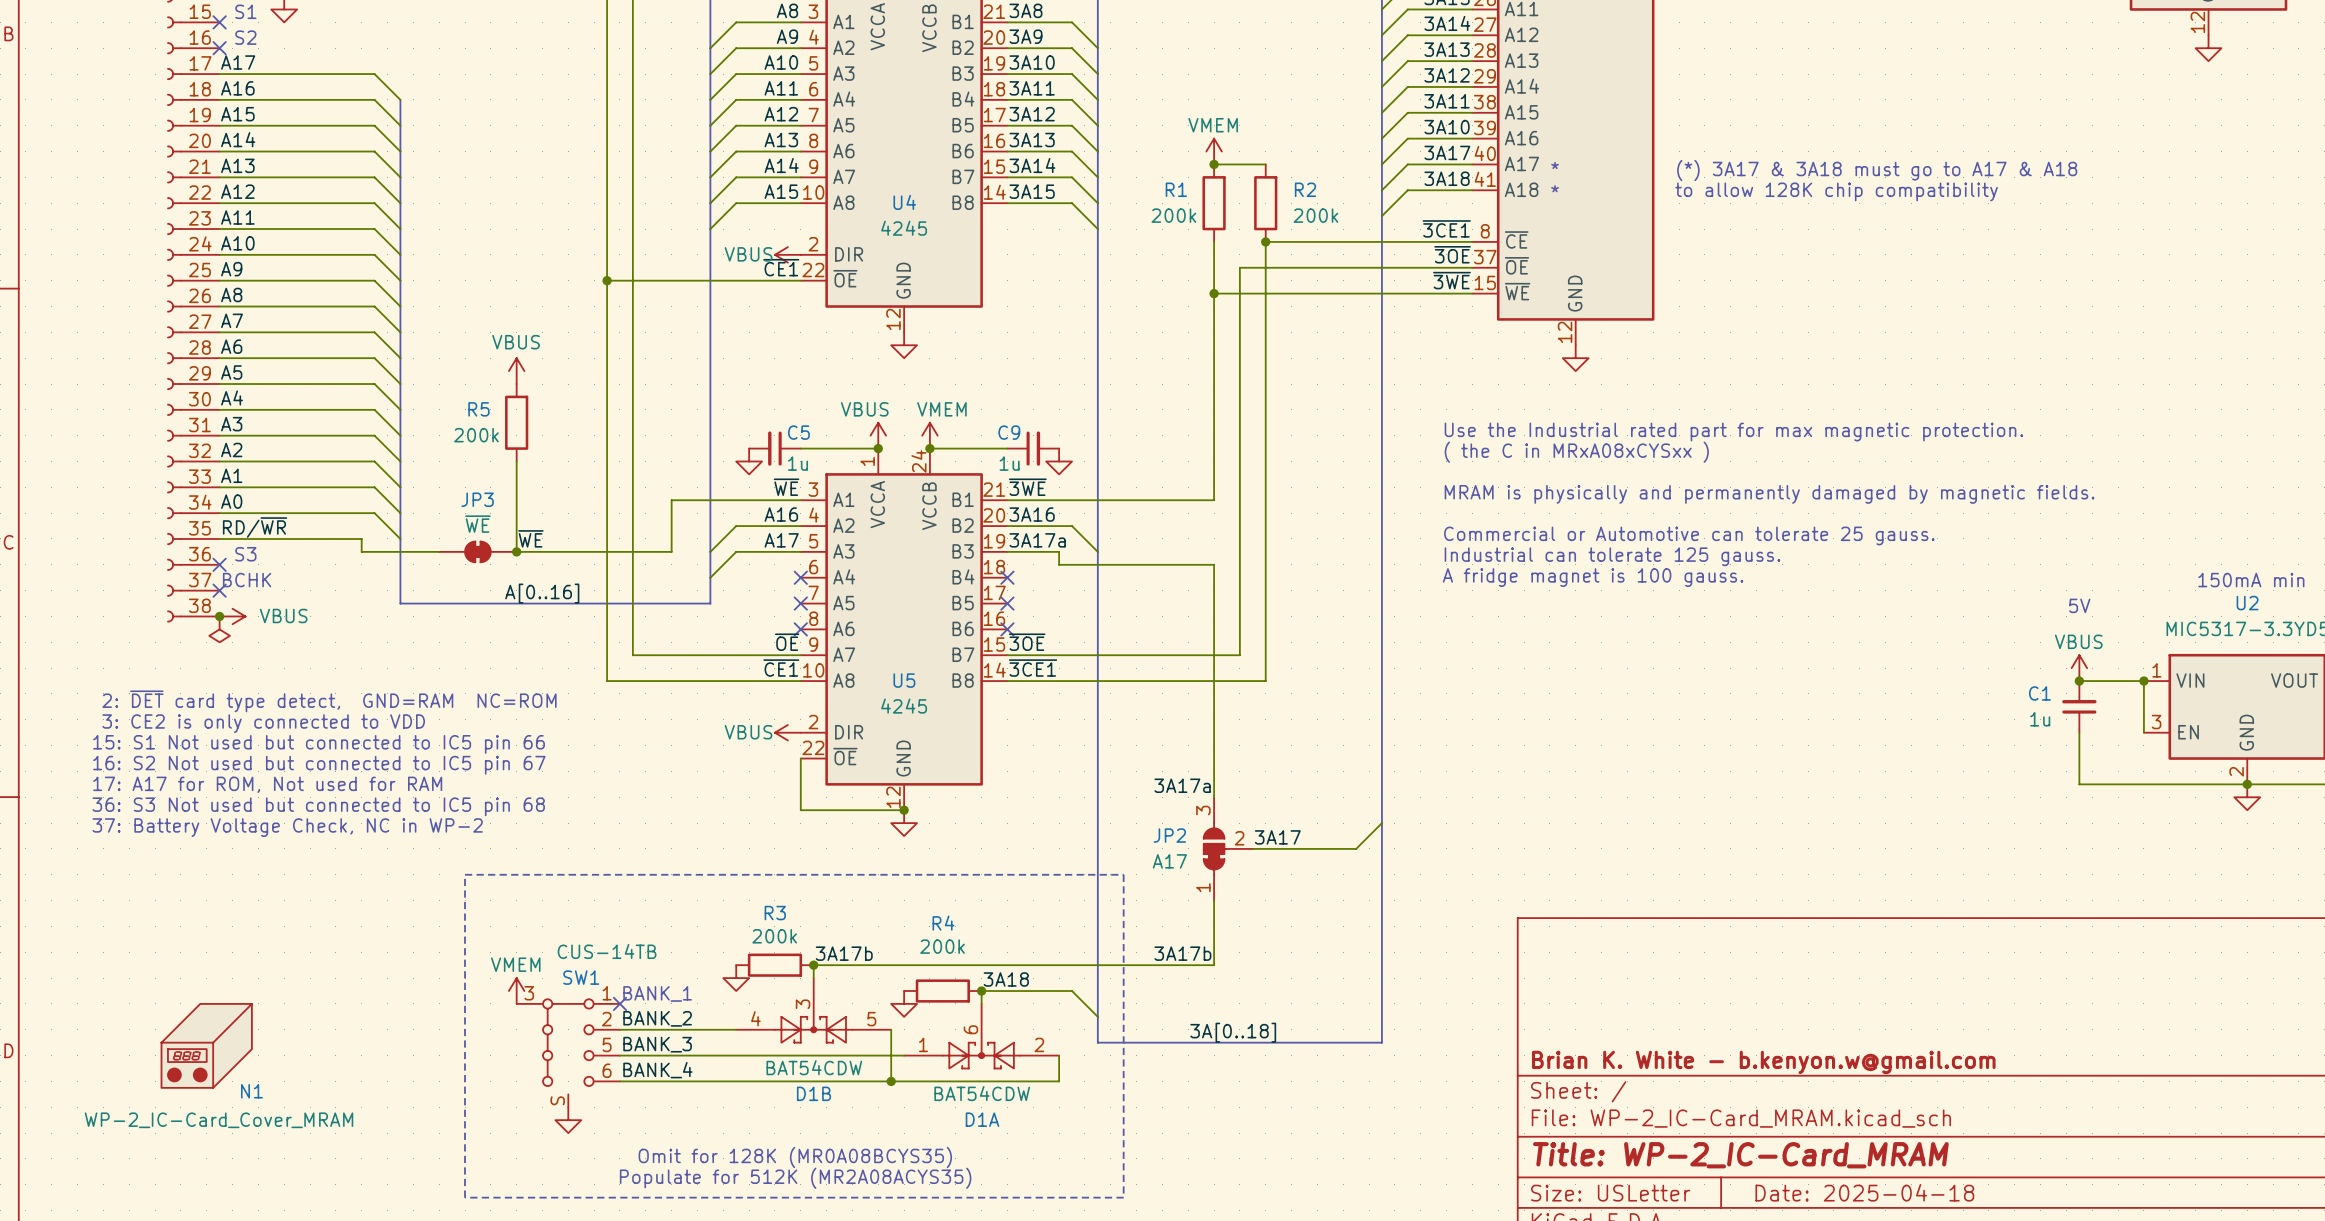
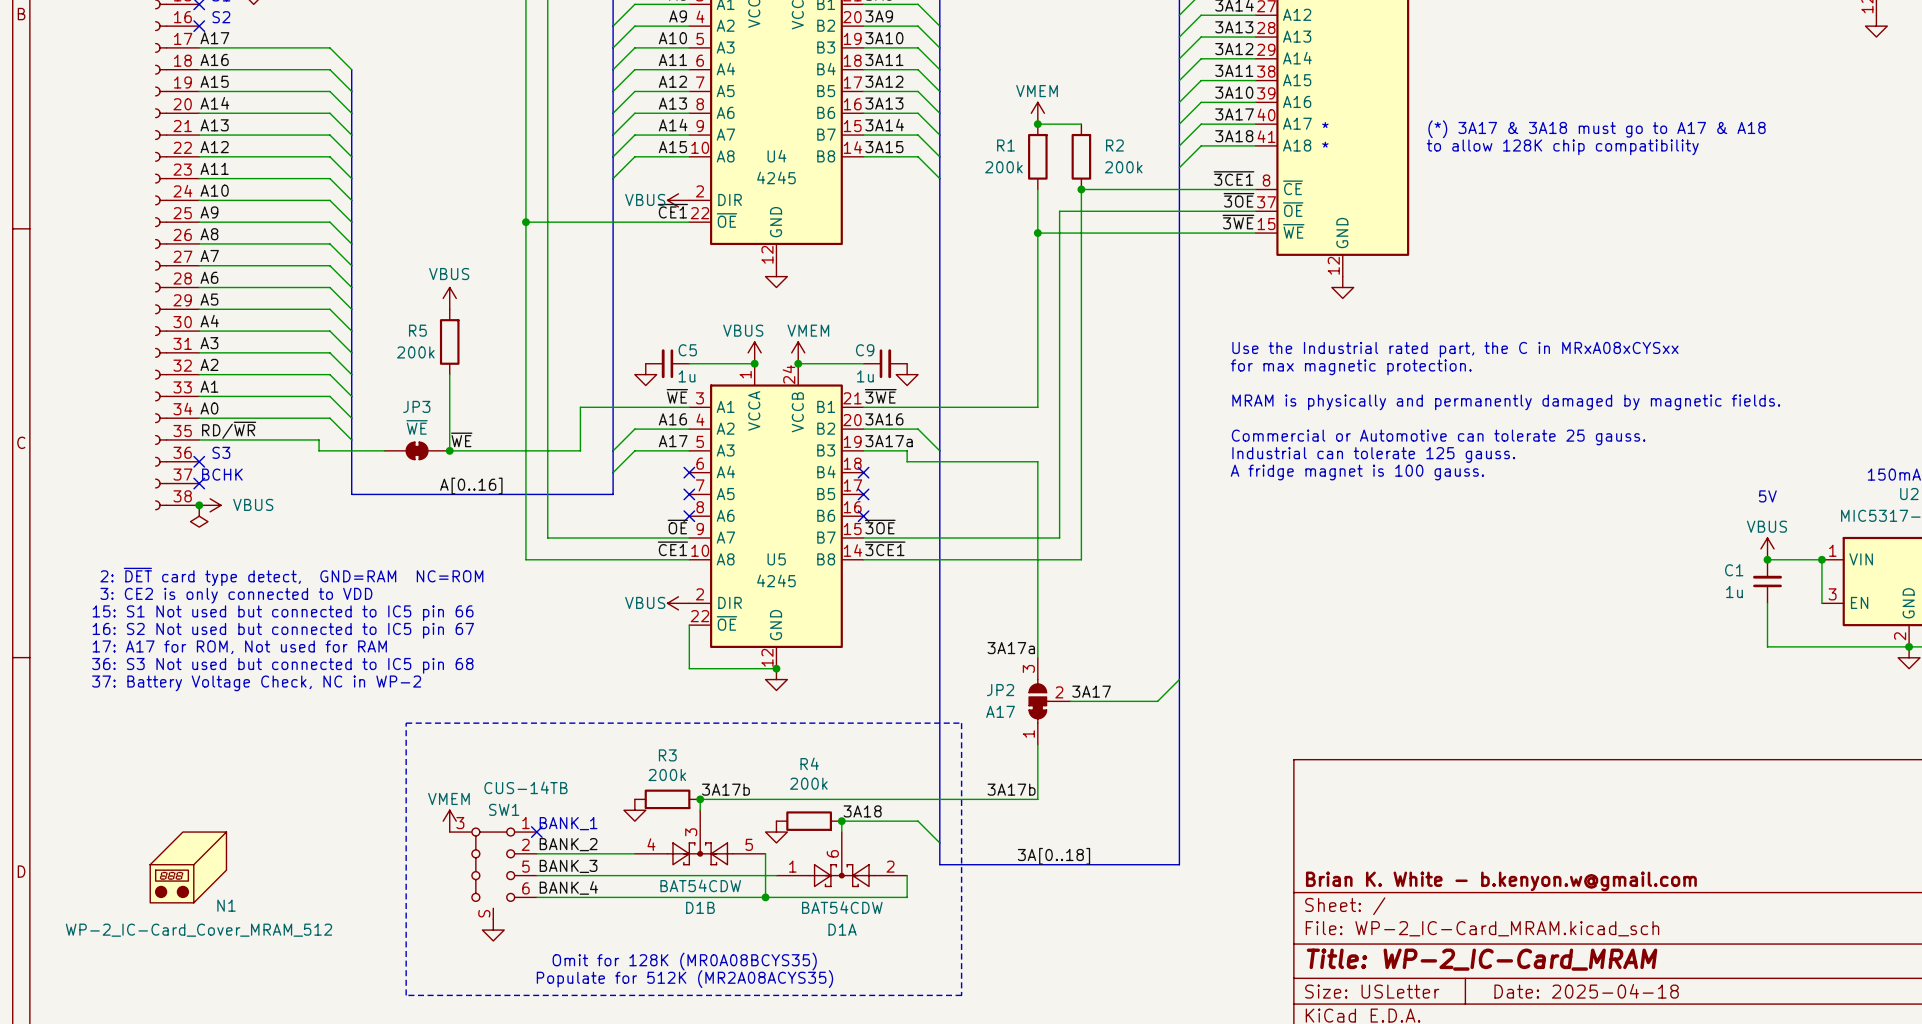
text: Use the Industrial rated part for max magnetic protection. (1733, 432) -> Use the Industrial rated part, the C in MRxA08xCYSxx (1455, 349)
text: ( the C in MRxA08xCYSxx ) (1576, 452) -> for max magnetic protection. (1351, 367)
N1 value: WP-2_IC-Card_Cover_MRAM (219, 1120) -> WP-2_IC-Card_Cover_MRAM_512 (198, 930)

